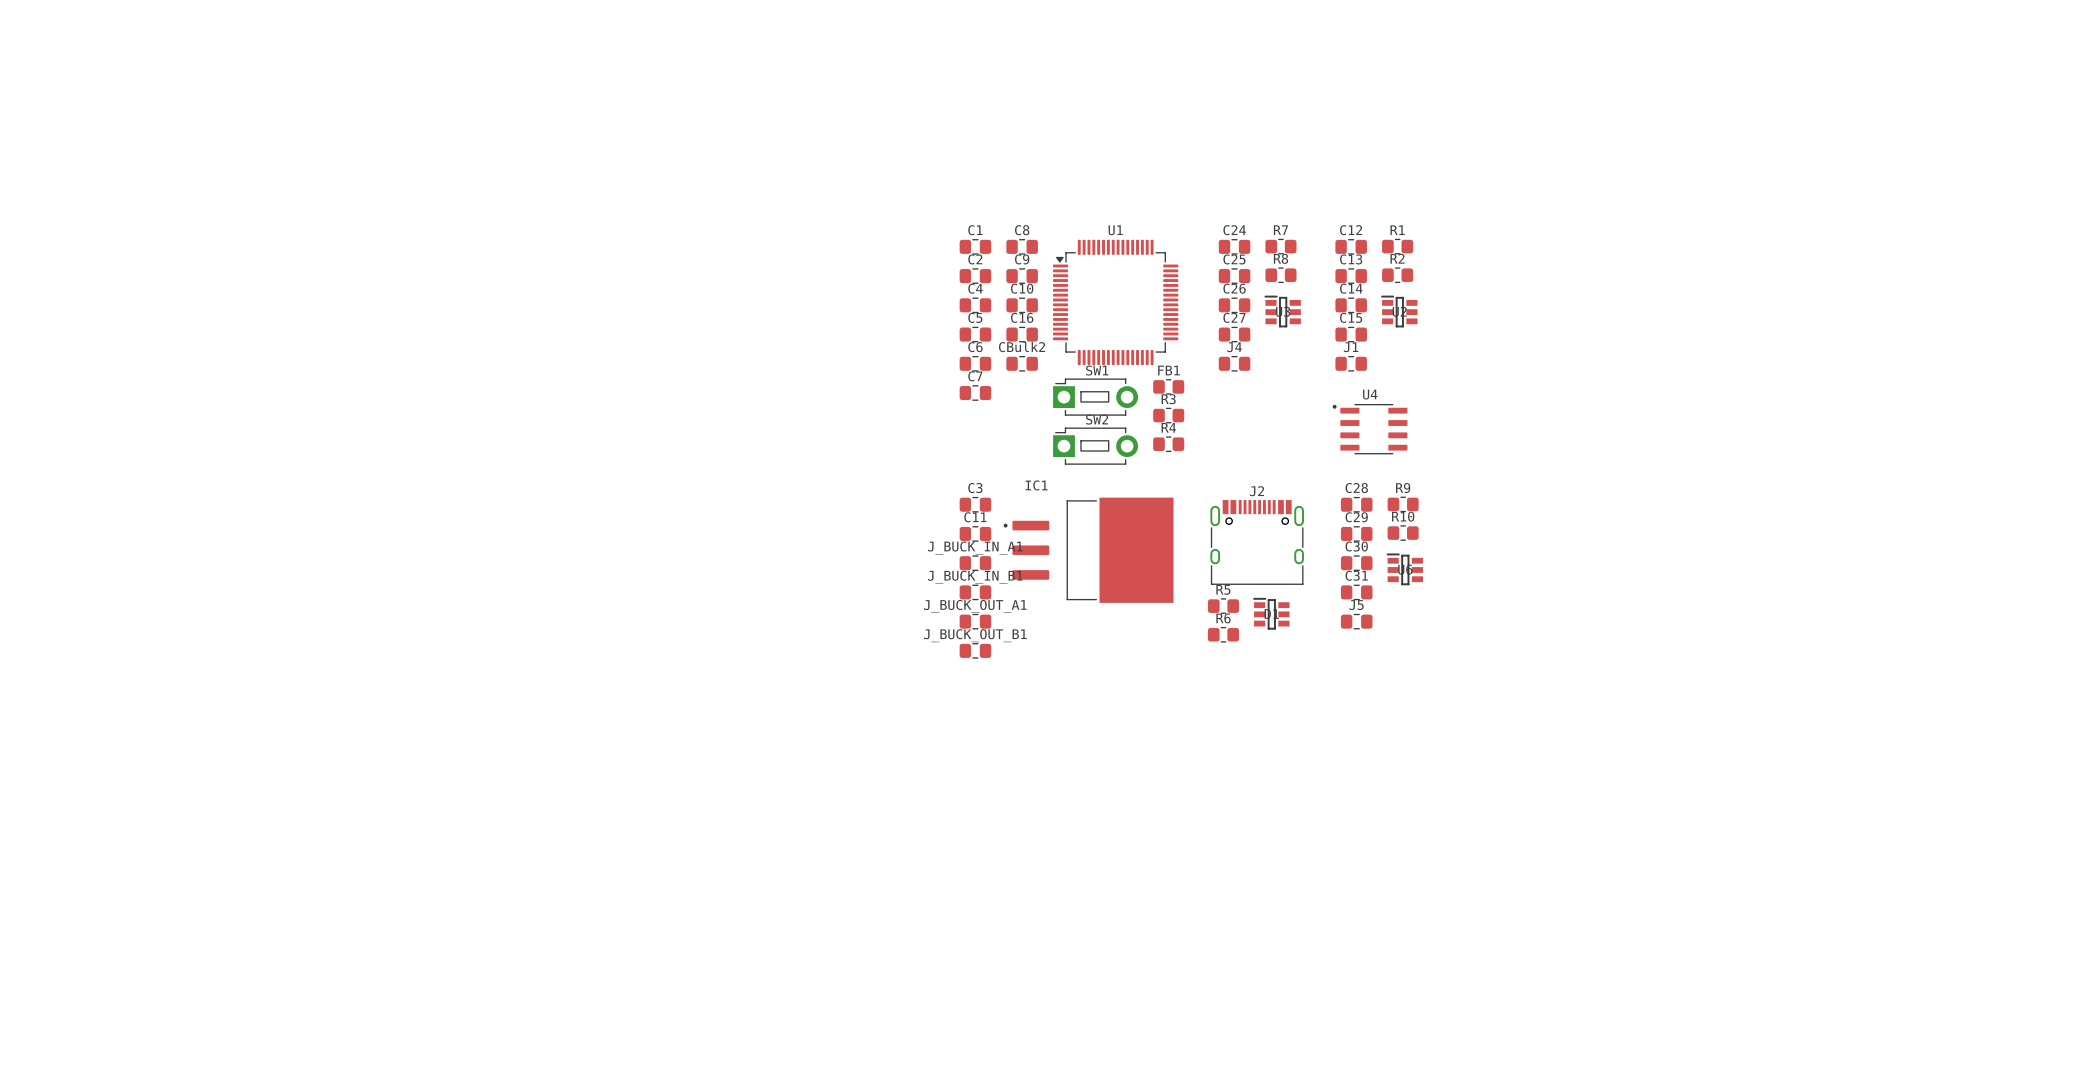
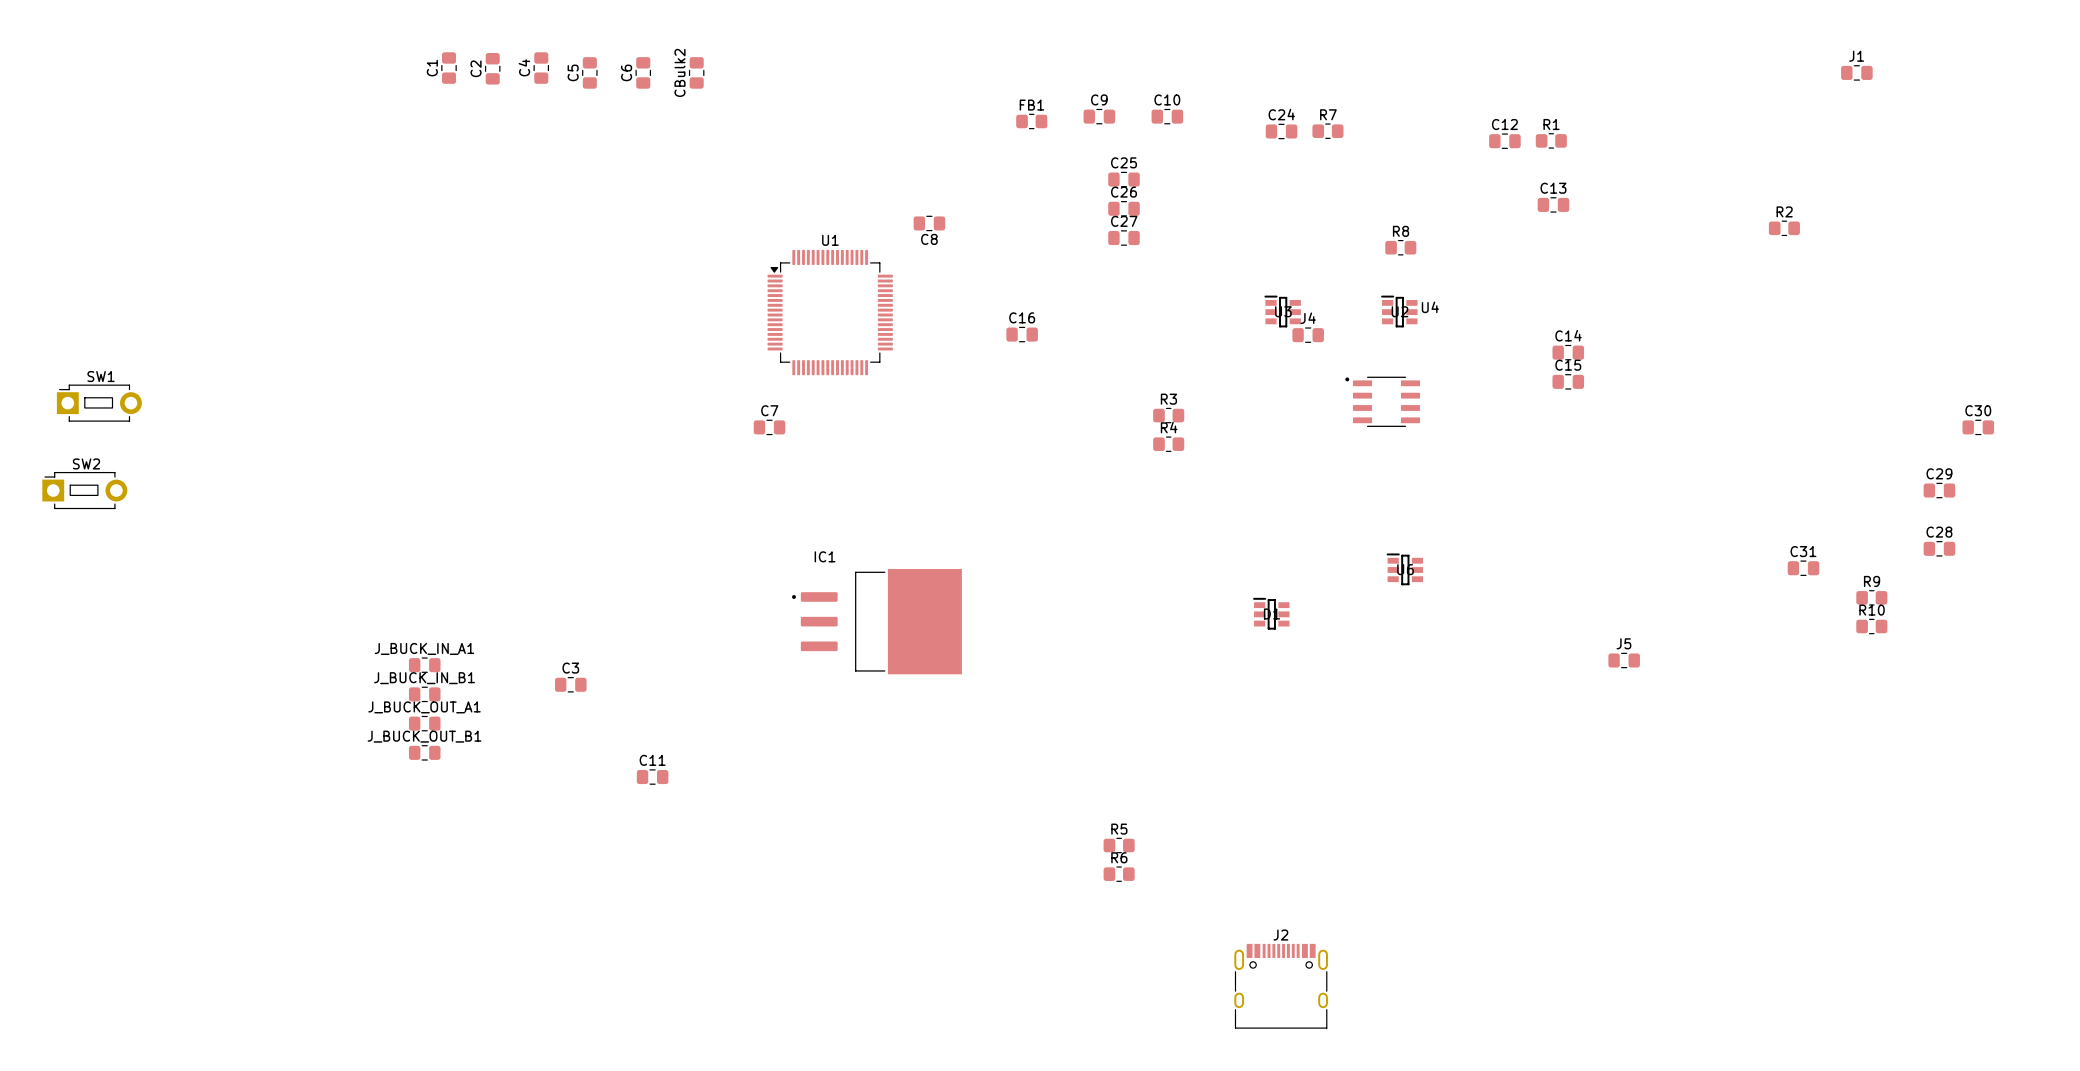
C1 name position: C1 (975, 230) -> C1 (432, 68)
C8 name position: C8 (1022, 230) -> C8 (929, 239)
C1 rotation: 0° (975, 246) -> 90° clockwise (449, 68)
C1 position: (975, 246) -> (449, 68)
C8 position: (1022, 246) -> (929, 223)
C24 position: (1234, 246) -> (1281, 131)
R7 position: (1280, 246) -> (1327, 131)
C12 position: (1351, 246) -> (1504, 141)
R1 position: (1397, 246) -> (1551, 140)
C2 name position: C2 (975, 259) -> C2 (476, 68)
R8 position: (1280, 275) -> (1400, 247)
R2 position: (1397, 275) -> (1784, 228)
C2 rotation: 0° (975, 276) -> 90° clockwise (492, 68)
C2 position: (975, 276) -> (492, 68)
C9 position: (1022, 276) -> (1099, 116)
C25 position: (1234, 276) -> (1123, 179)
C13 position: (1351, 276) -> (1553, 204)
C4 name position: C4 (975, 288) -> C4 (524, 67)
U1 position: (1115, 302) -> (830, 312)
C4 rotation: 0° (975, 305) -> 90° clockwise (541, 68)
C4 position: (975, 305) -> (541, 68)
C10 position: (1022, 305) -> (1167, 116)
C26 position: (1234, 305) -> (1123, 208)
C14 position: (1351, 305) -> (1568, 352)
C5 name position: C5 (975, 317) -> C5 (573, 72)
C5 rotation: 0° (975, 334) -> 90° clockwise (589, 72)
C5 position: (975, 334) -> (589, 72)
C27 position: (1234, 334) -> (1123, 238)
C15 position: (1351, 334) -> (1568, 381)
CBulk2 name position: CBulk2 (1022, 346) -> CBulk2 (679, 72)
C6 name position: C6 (975, 347) -> C6 (626, 72)
C6 rotation: 0° (975, 363) -> 90° clockwise (643, 72)
C6 position: (975, 363) -> (643, 72)
CBulk2 rotation: 0° (1022, 363) -> 90° clockwise (696, 72)
CBulk2 position: (1022, 363) -> (696, 72)
J4 position: (1234, 363) -> (1308, 335)
J1 position: (1351, 363) -> (1856, 72)
FB1 position: (1168, 386) -> (1031, 121)
C7 position: (975, 393) -> (769, 427)
U4 name position: U4 (1370, 394) -> U4 (1430, 307)
SW1 position: (1095, 397) -> (99, 403)
U4 position: (1370, 429) -> (1382, 401)
SW2 position: (1095, 446) -> (84, 490)
C3 position: (975, 504) -> (570, 684)
C28 position: (1356, 504) -> (1939, 548)
R9 position: (1403, 504) -> (1871, 597)
C11 position: (975, 533) -> (652, 777)
C29 position: (1356, 533) -> (1939, 490)
R10 position: (1403, 533) -> (1871, 626)
J2 position: (1257, 542) -> (1281, 986)
IC1 position: (1088, 550) -> (876, 621)
J_BUCK_IN_A1 position: (975, 563) -> (424, 665)
C30 position: (1356, 563) -> (1978, 427)
J_BUCK_IN_B1 position: (975, 592) -> (424, 694)
C31 position: (1356, 592) -> (1803, 568)
R5 position: (1223, 606) -> (1119, 845)
J_BUCK_OUT_A1 position: (975, 621) -> (424, 723)
J5 position: (1356, 621) -> (1624, 660)
R6 position: (1223, 634) -> (1119, 874)
J_BUCK_OUT_B1 position: (975, 650) -> (424, 752)

